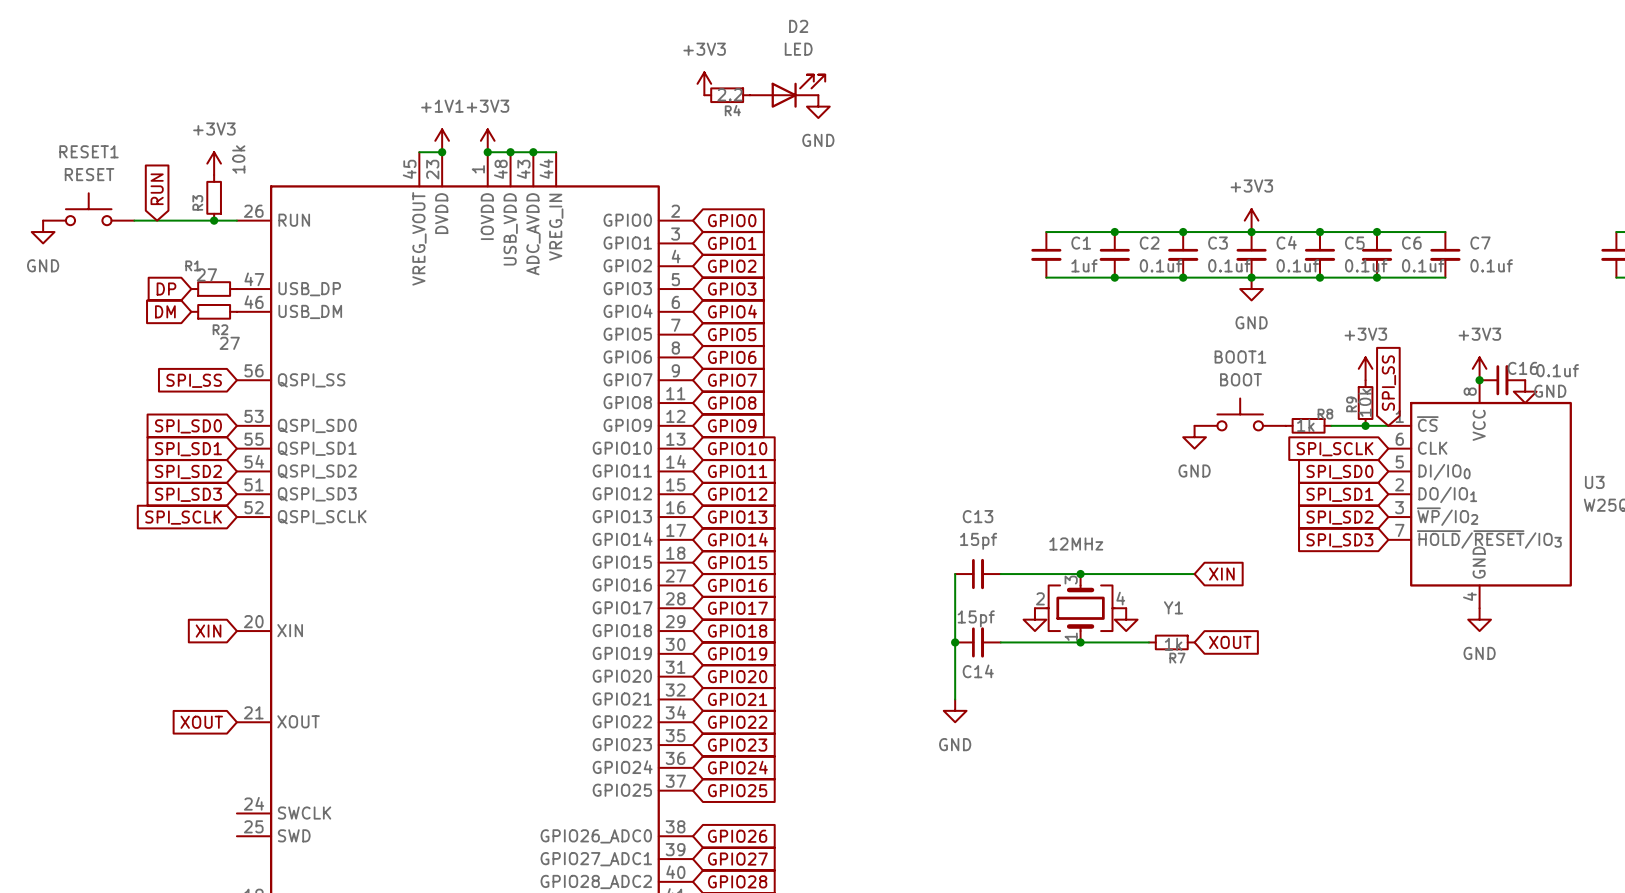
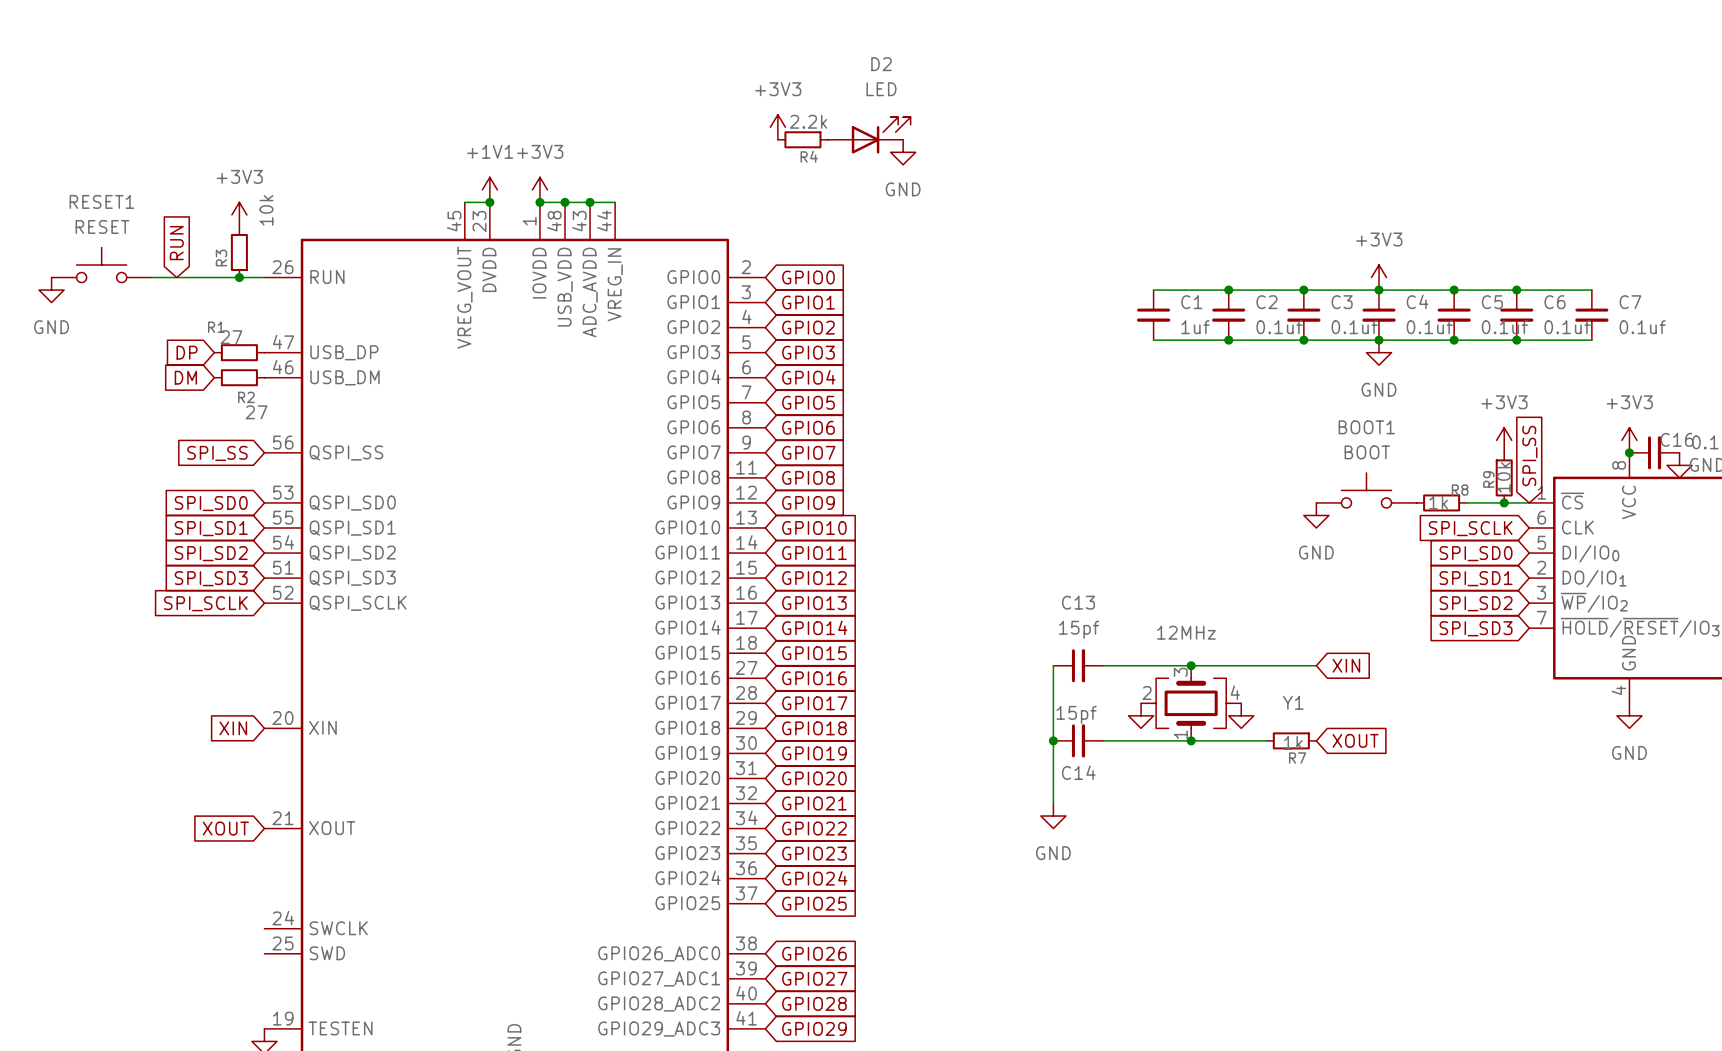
R4 value: 2.2 (729, 94) -> 2.2k (808, 121)

